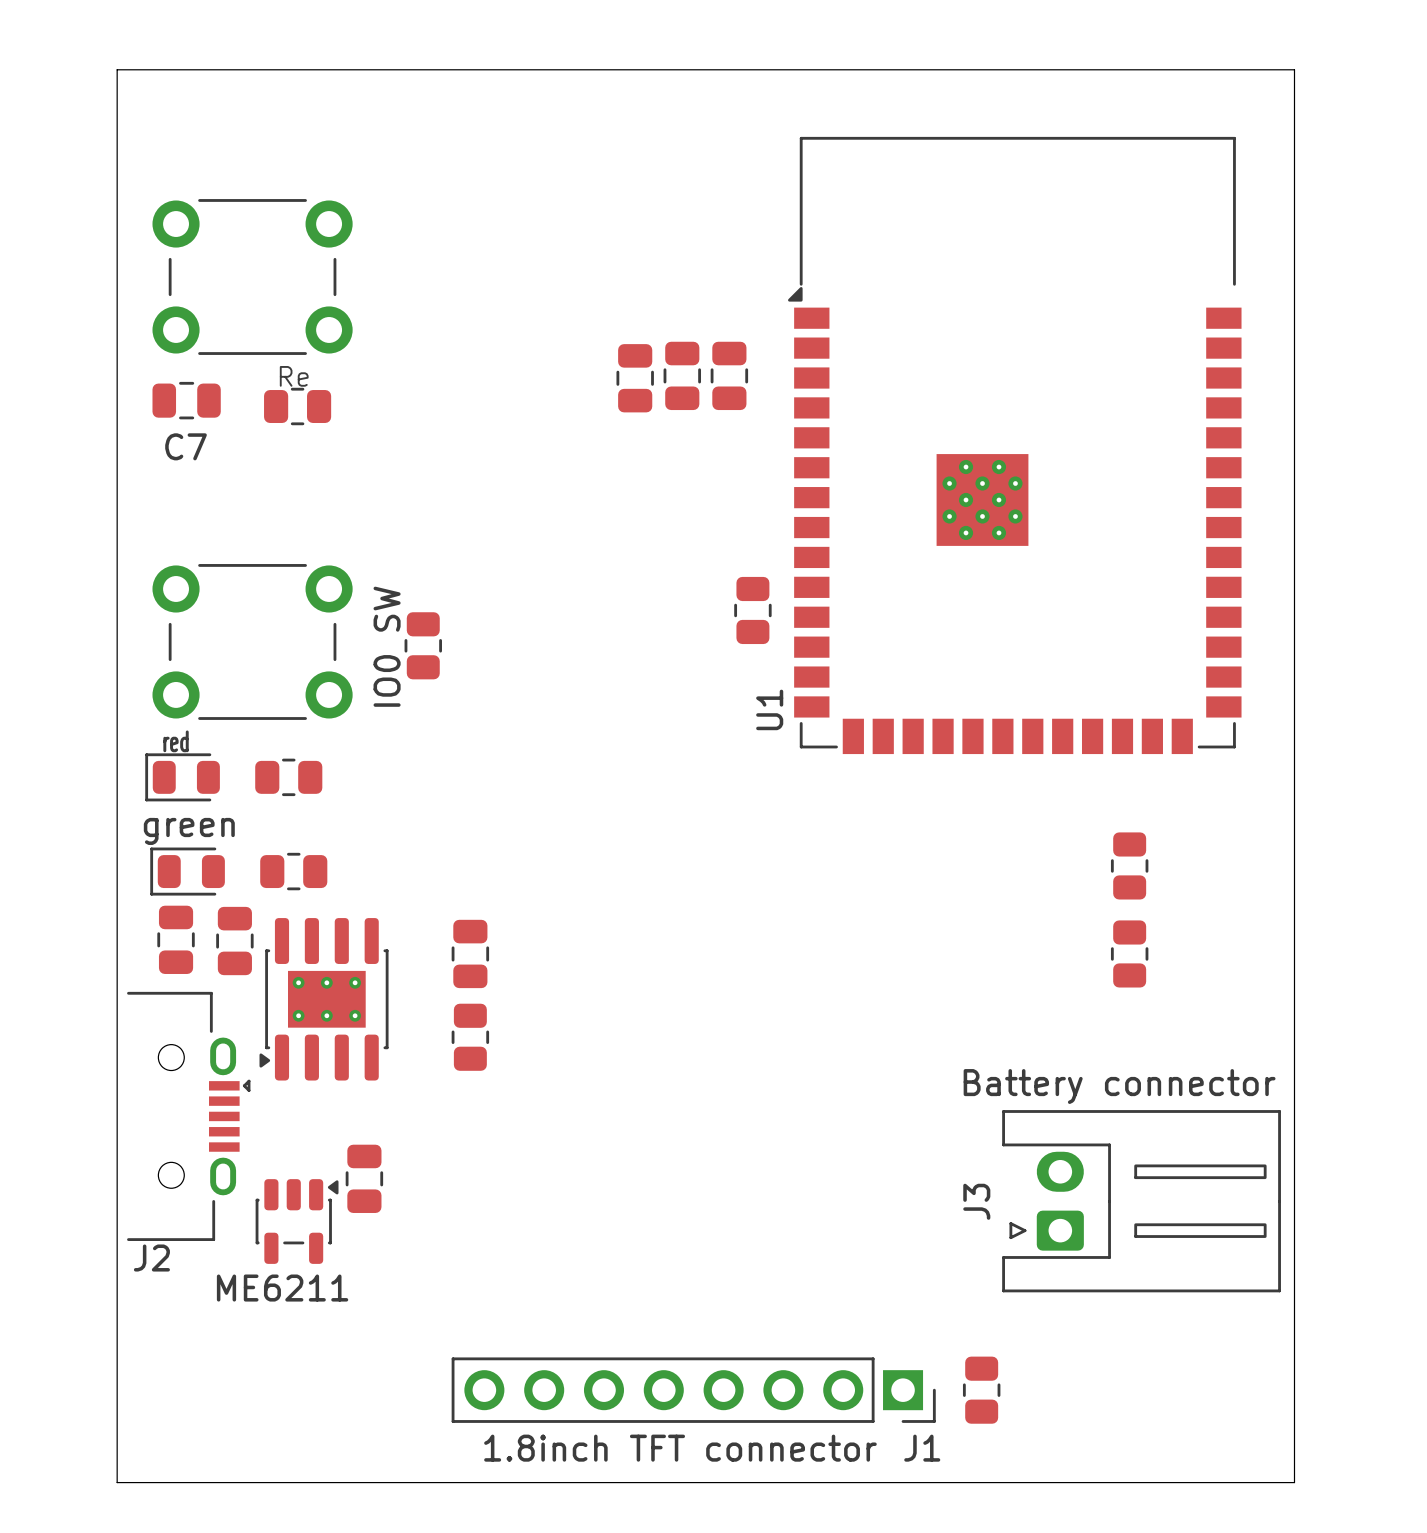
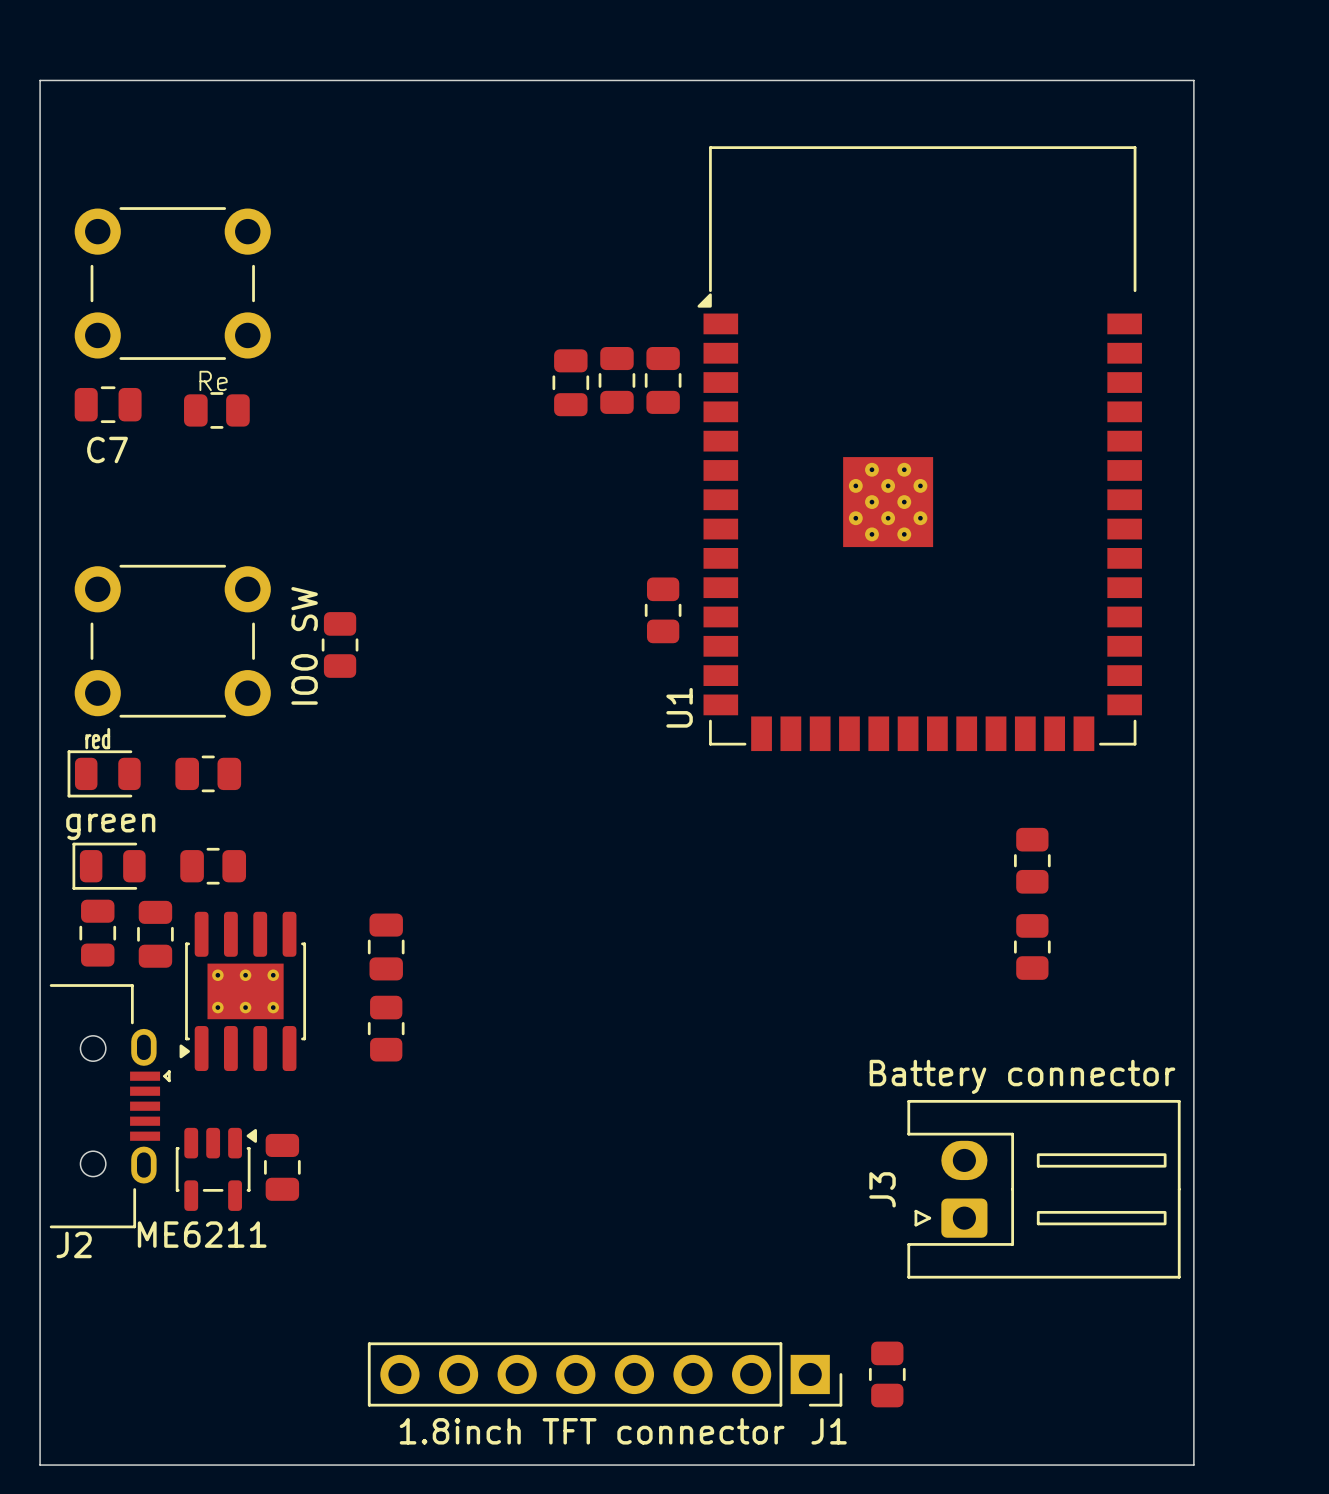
part: (682, 375) -> none
part: none -> (616, 380)
part: (729, 375) -> none
part: none -> (663, 380)
part: (635, 378) -> none
part: none -> (570, 382)
part position: (297, 1221) -> (216, 1169)

